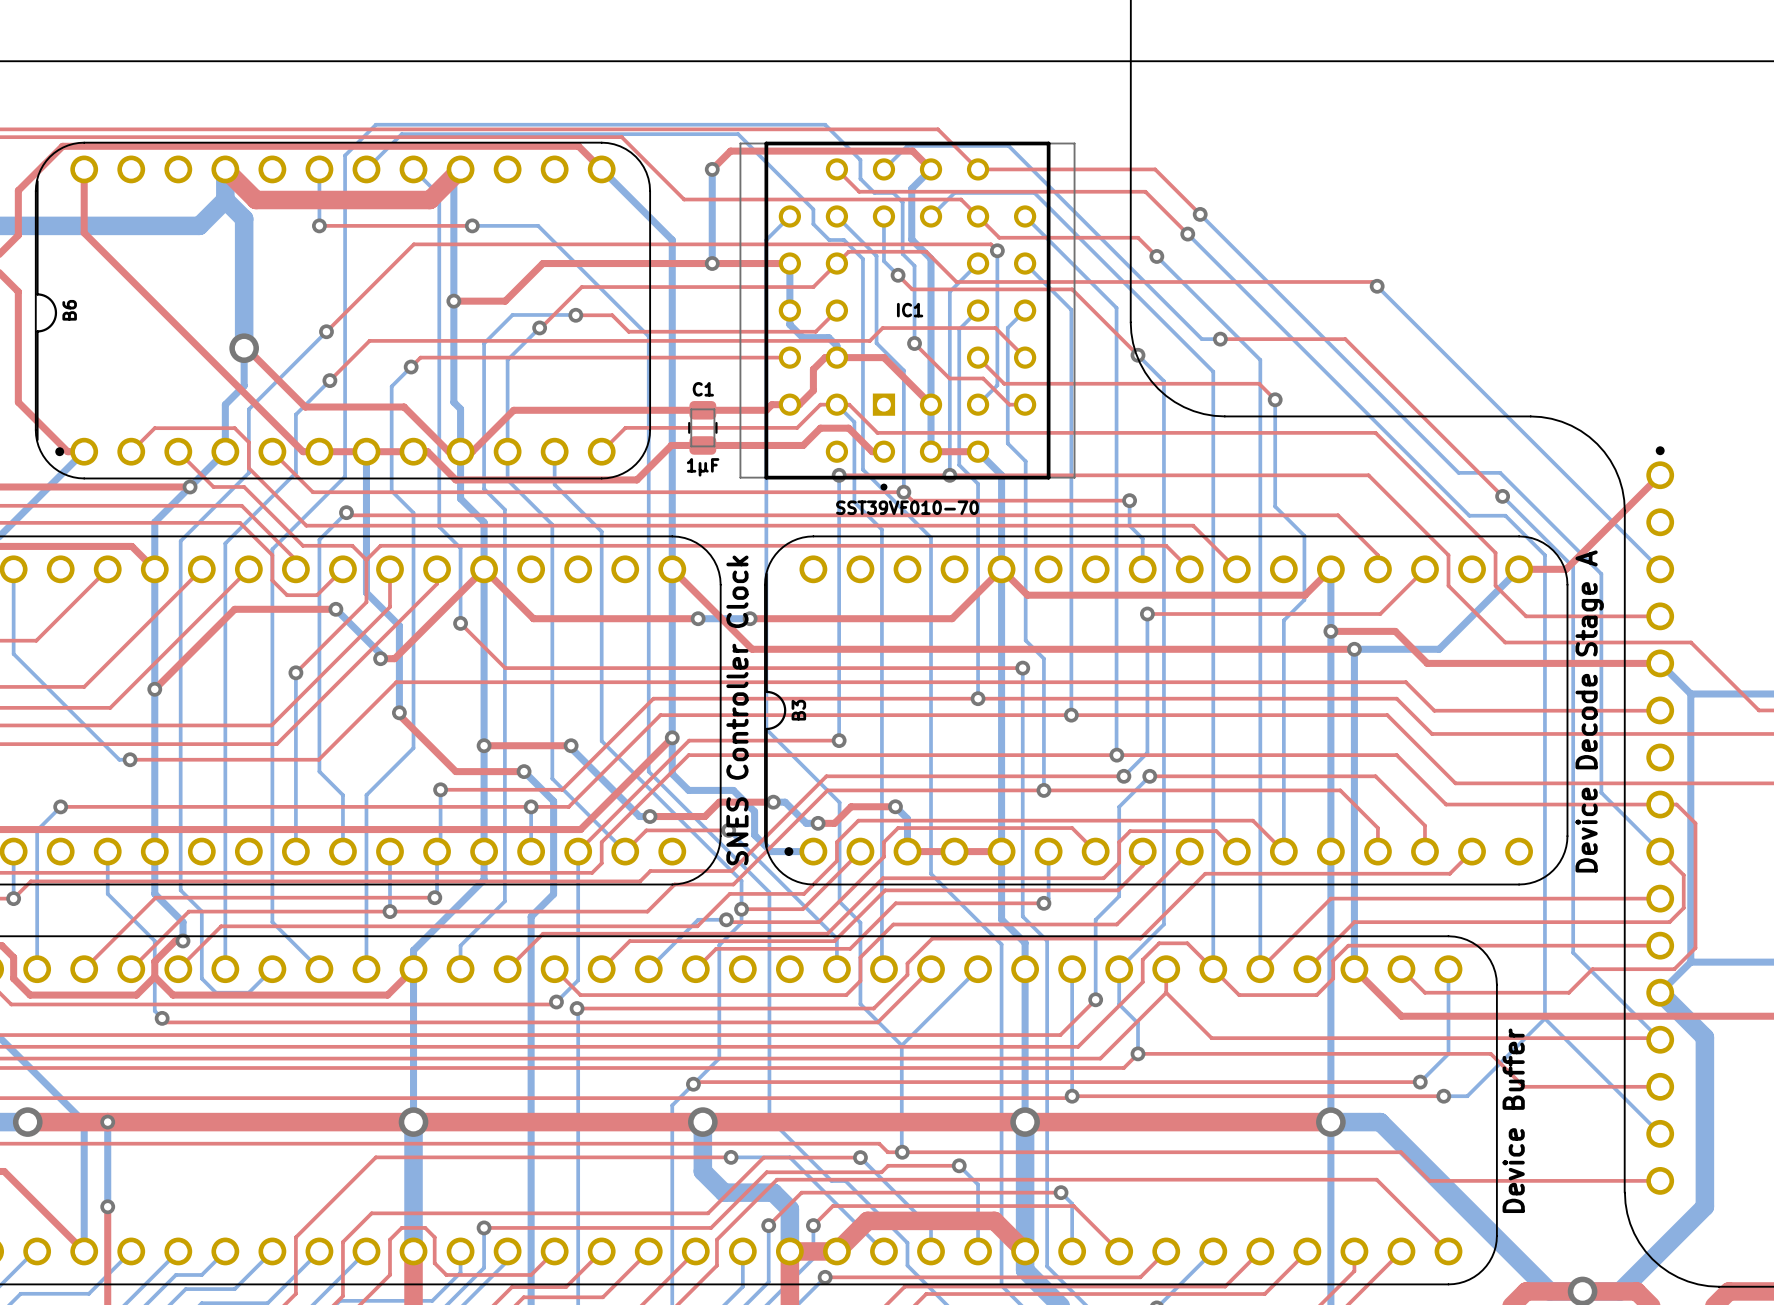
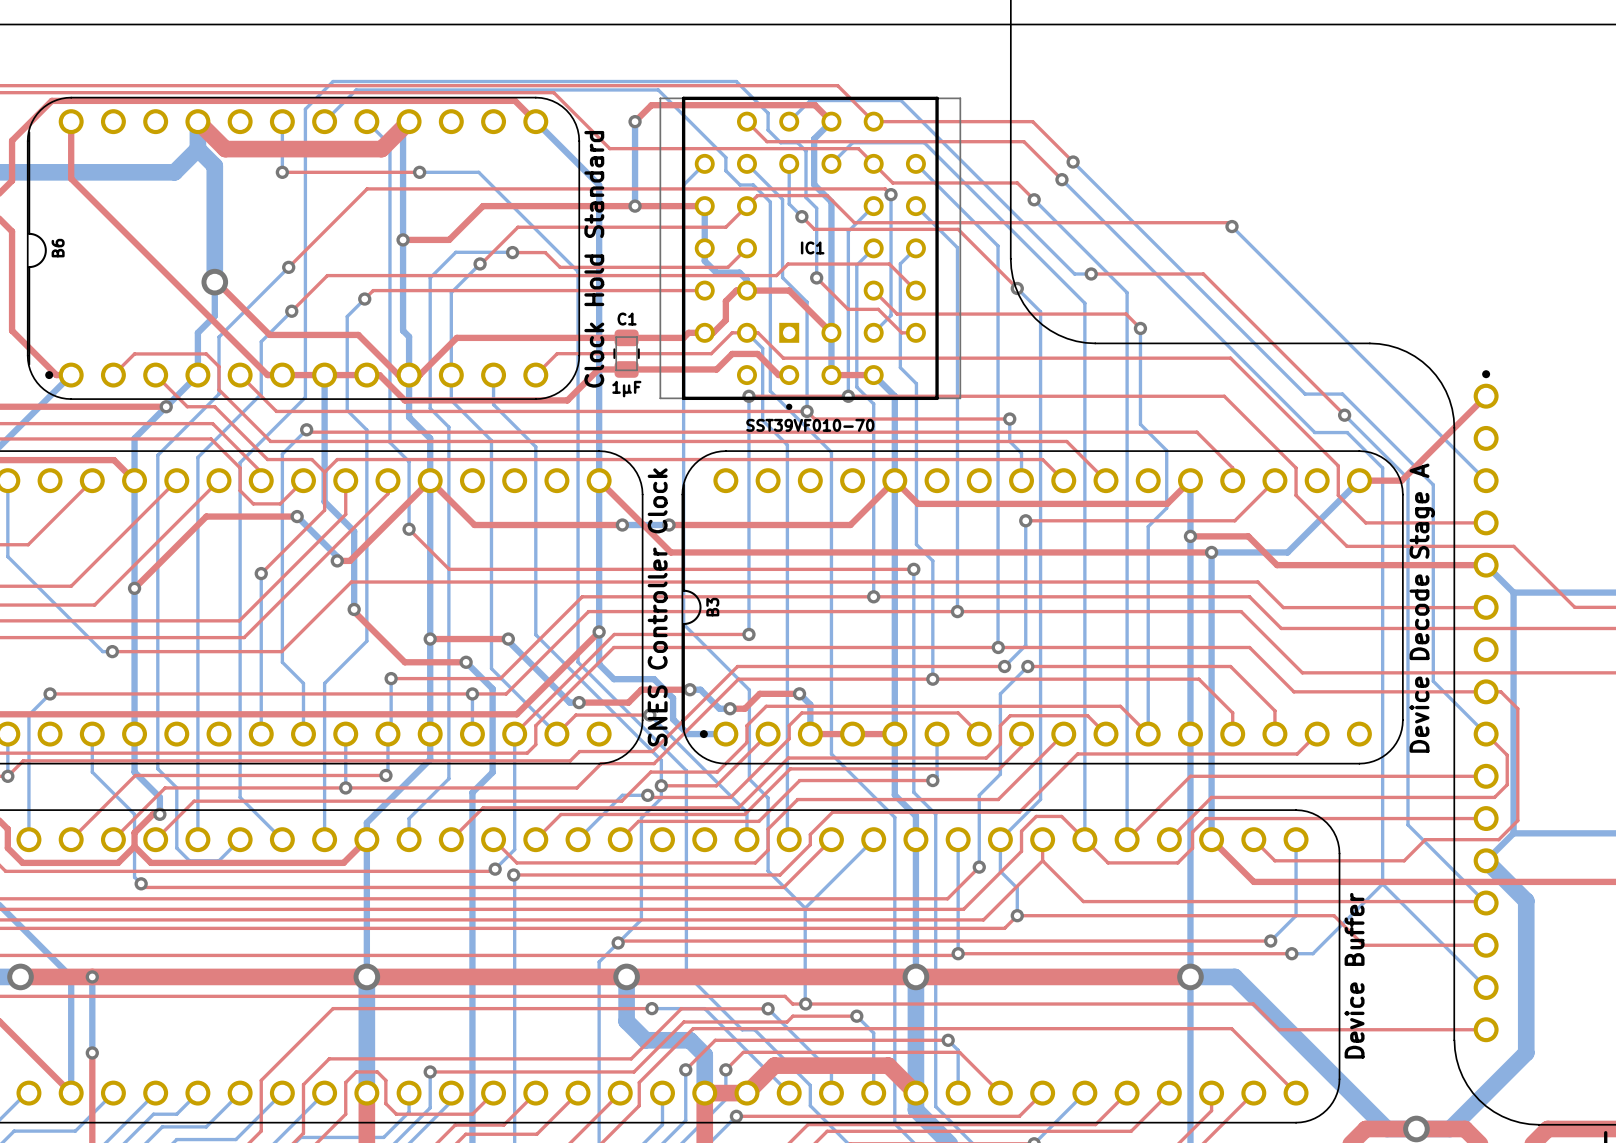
B6 text: none -> Clock Hold Standard (594, 259)
B3 text: none -> Device Decode Stage A (1422, 608)
B3 text: Device Decode Stage A (1589, 711) -> none

